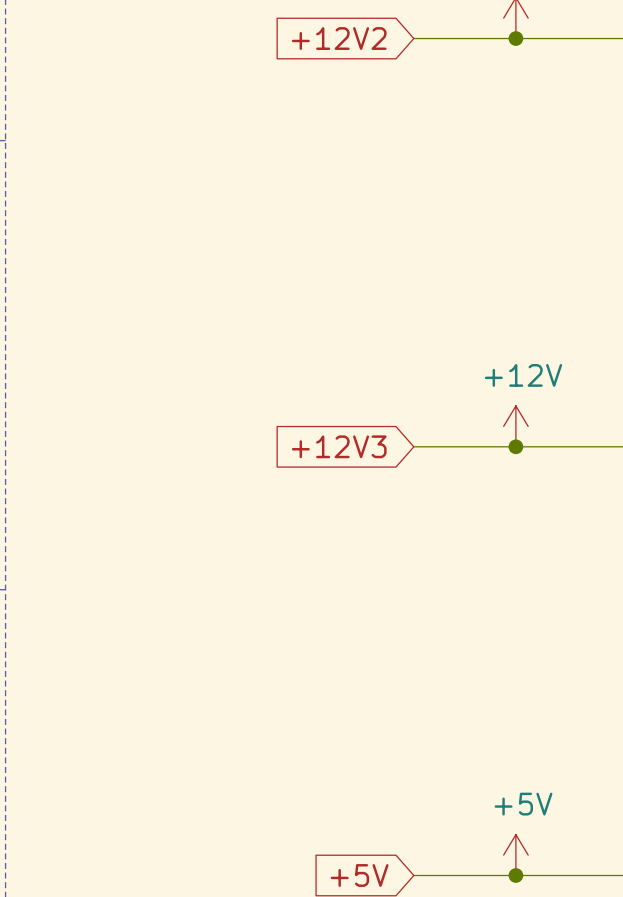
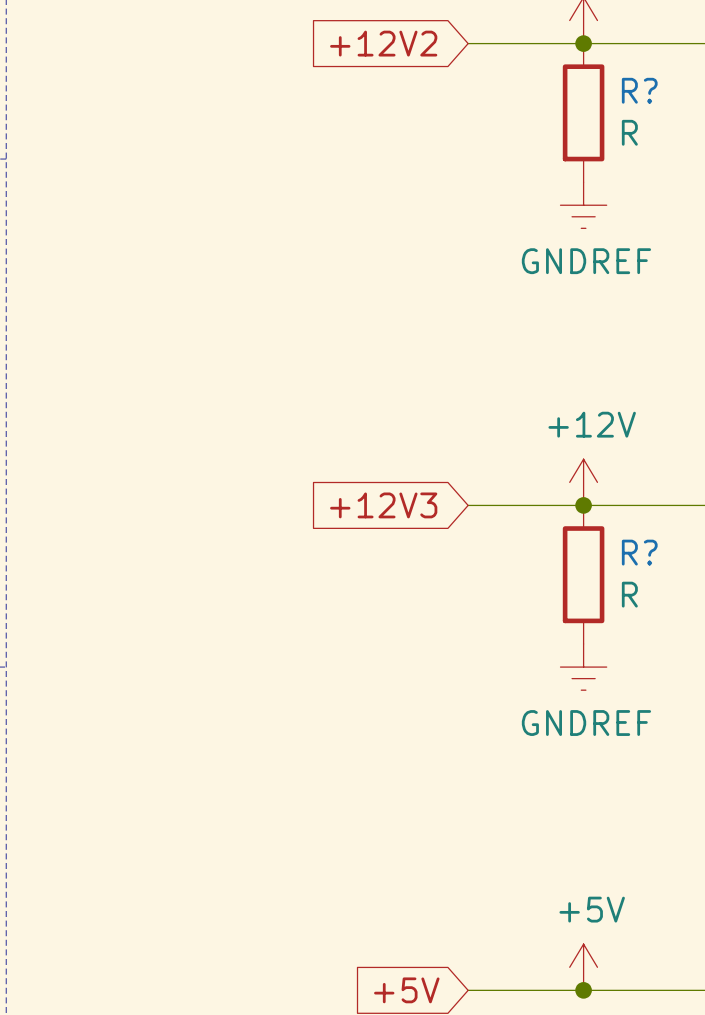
R?: none -> R (583, 112)
power symbol: none -> GNDREF (583, 205)
R?: none -> R (583, 574)
power symbol: none -> GNDREF (583, 667)

